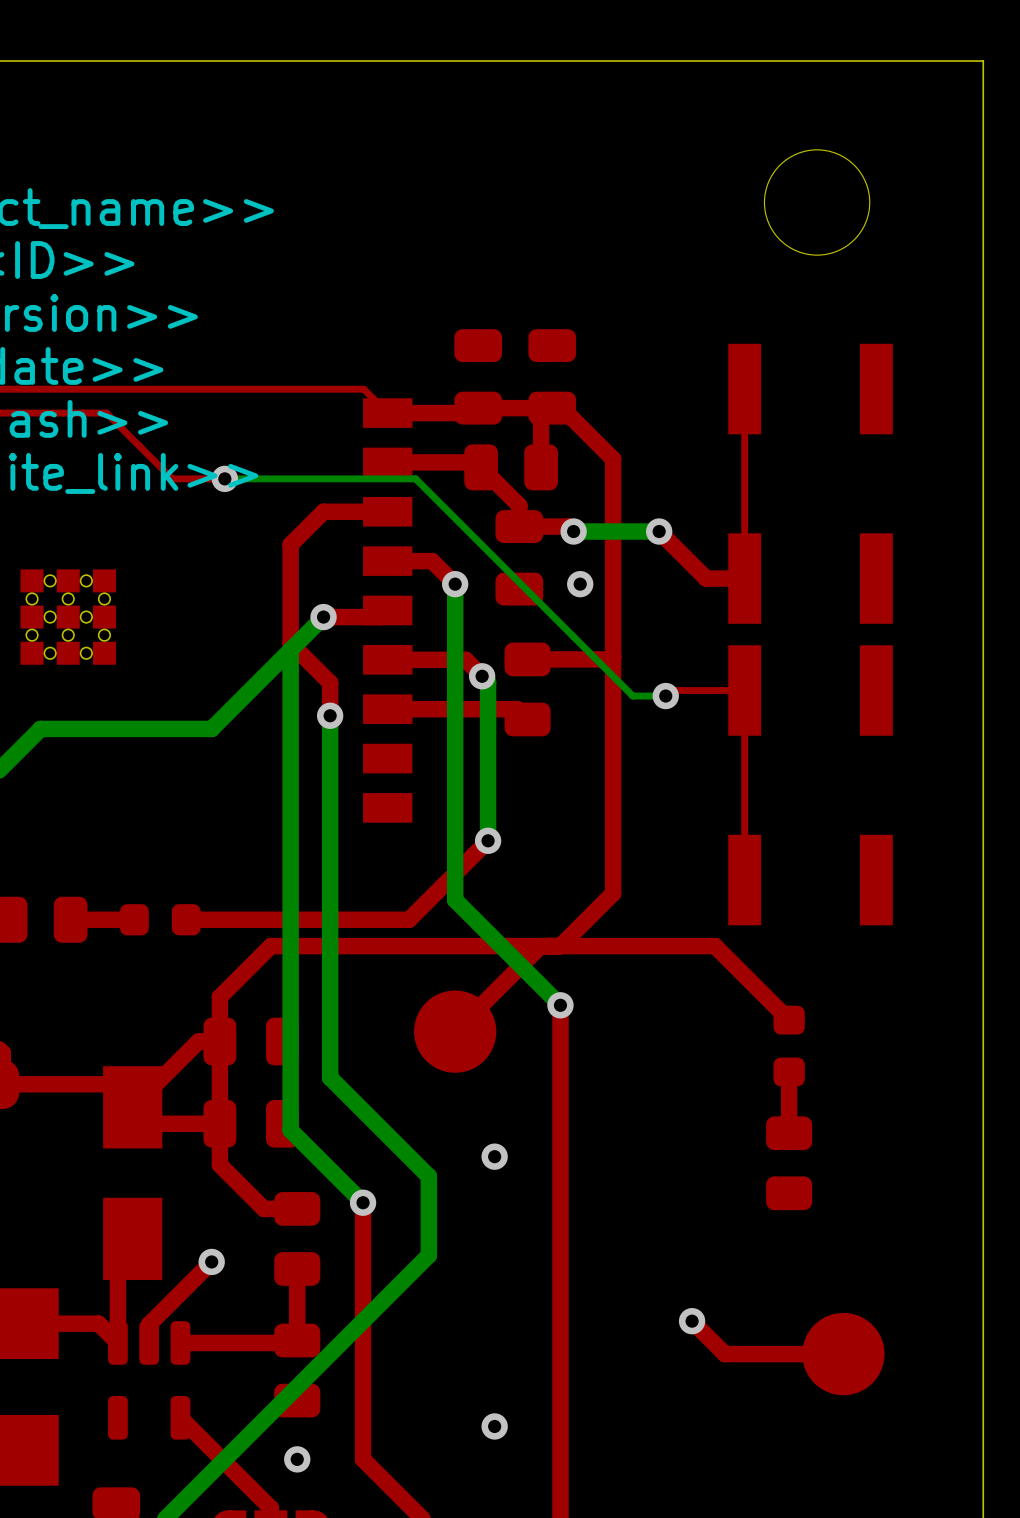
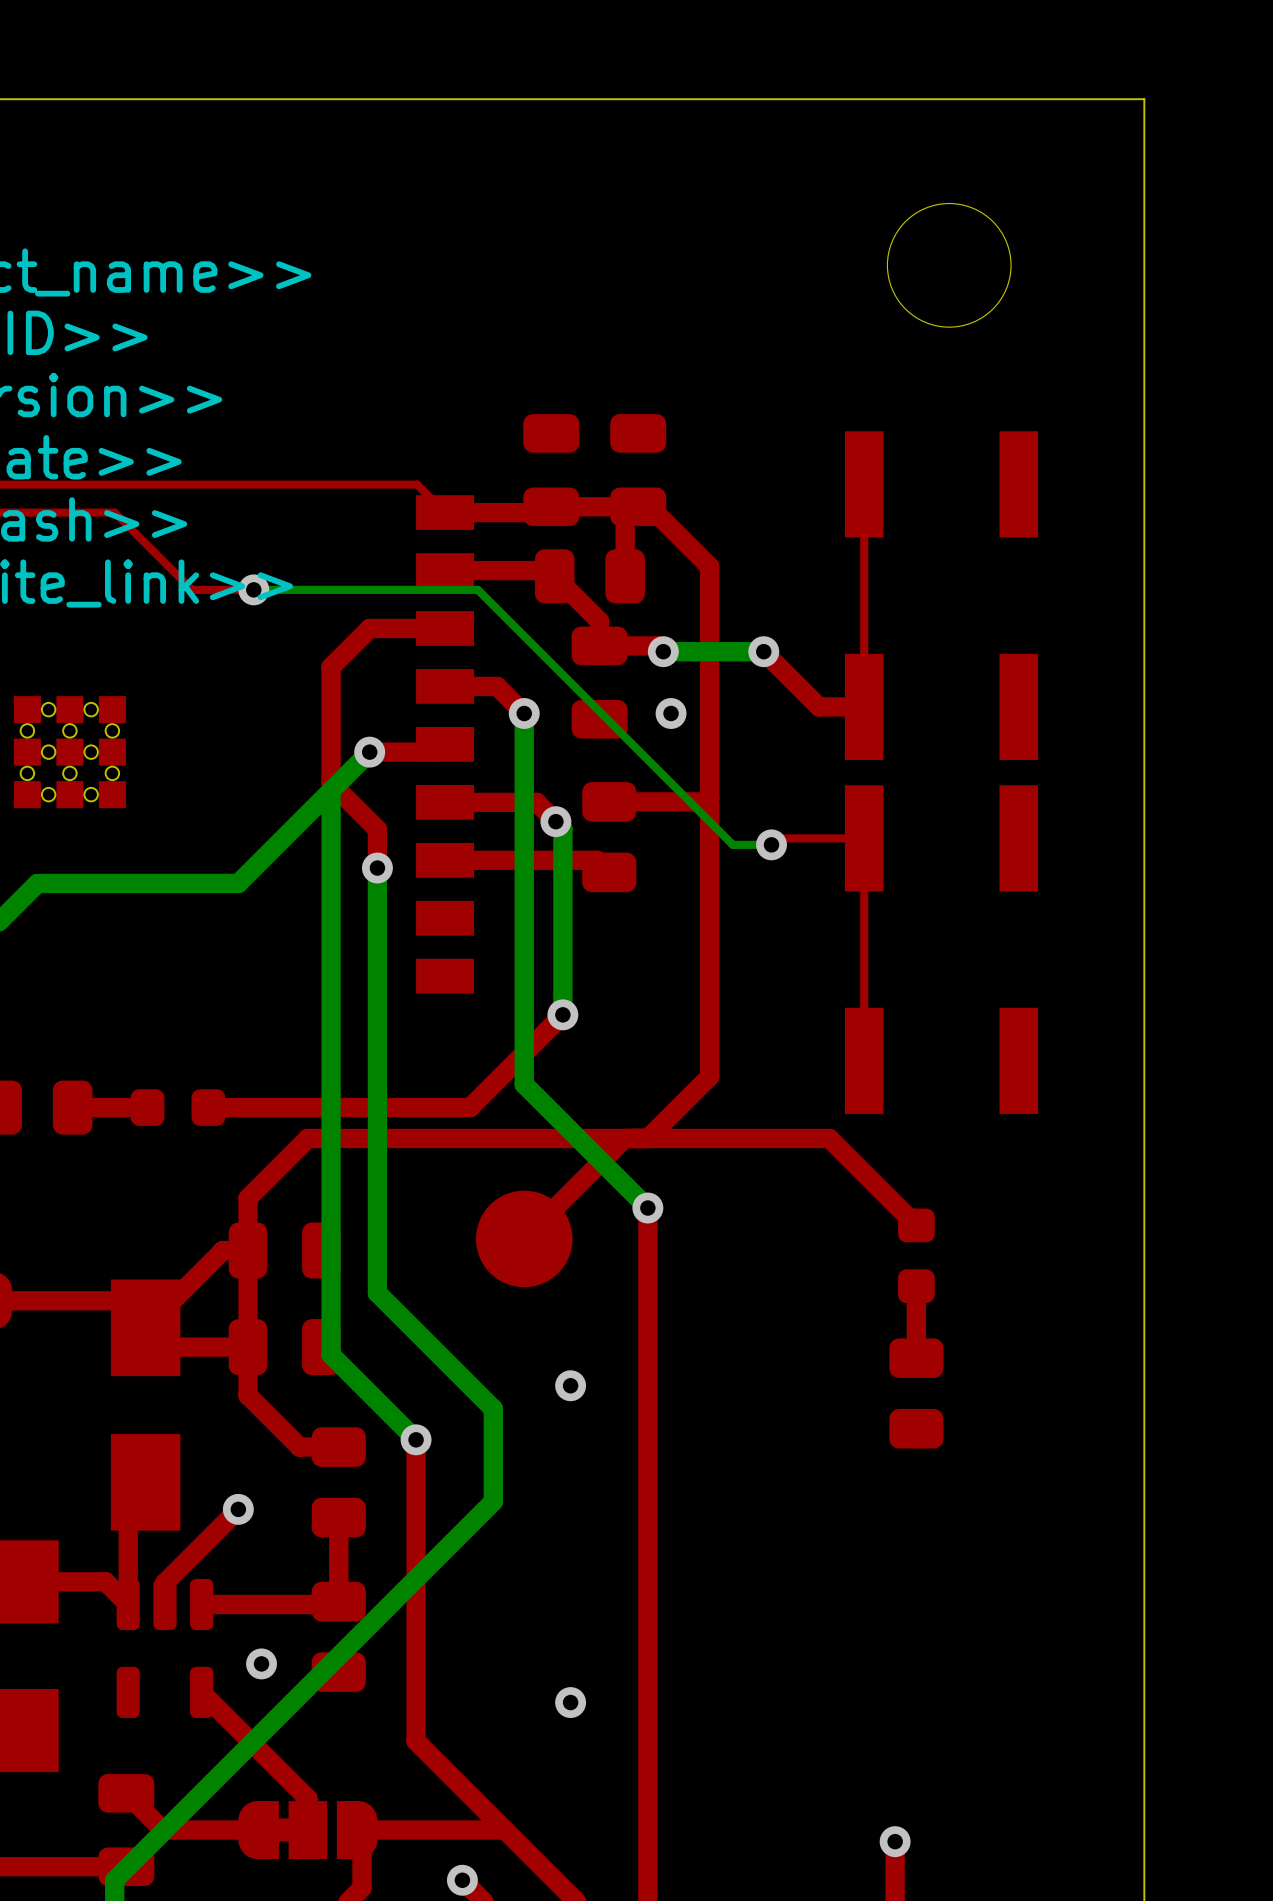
top track: (692, 1321) (724, 1354) (843, 1354) -> none
via: (692, 1321) -> none
part: (843, 1354) -> none
via position: (297, 1459) -> (261, 1663)

